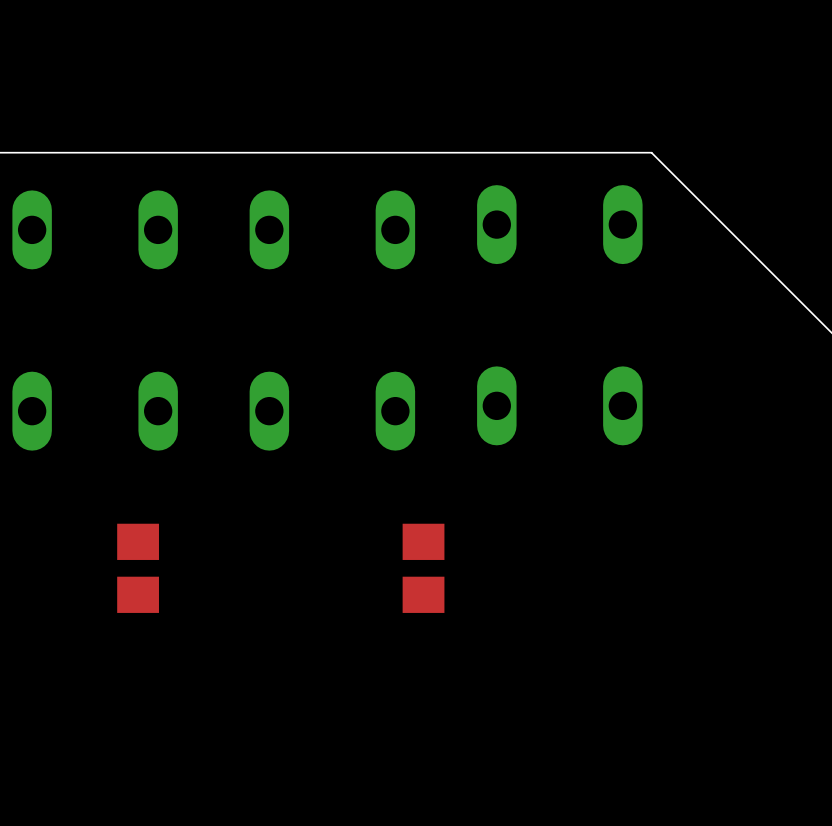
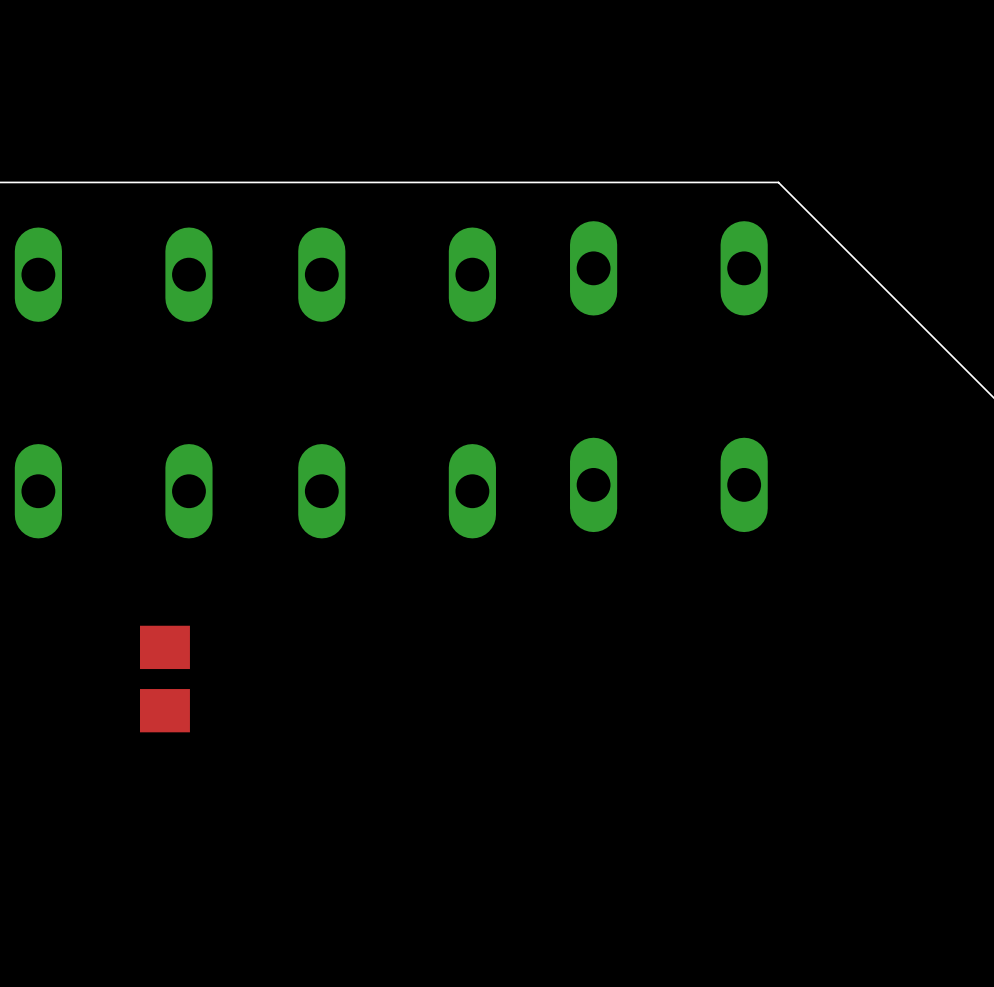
part: (423, 568) -> none

